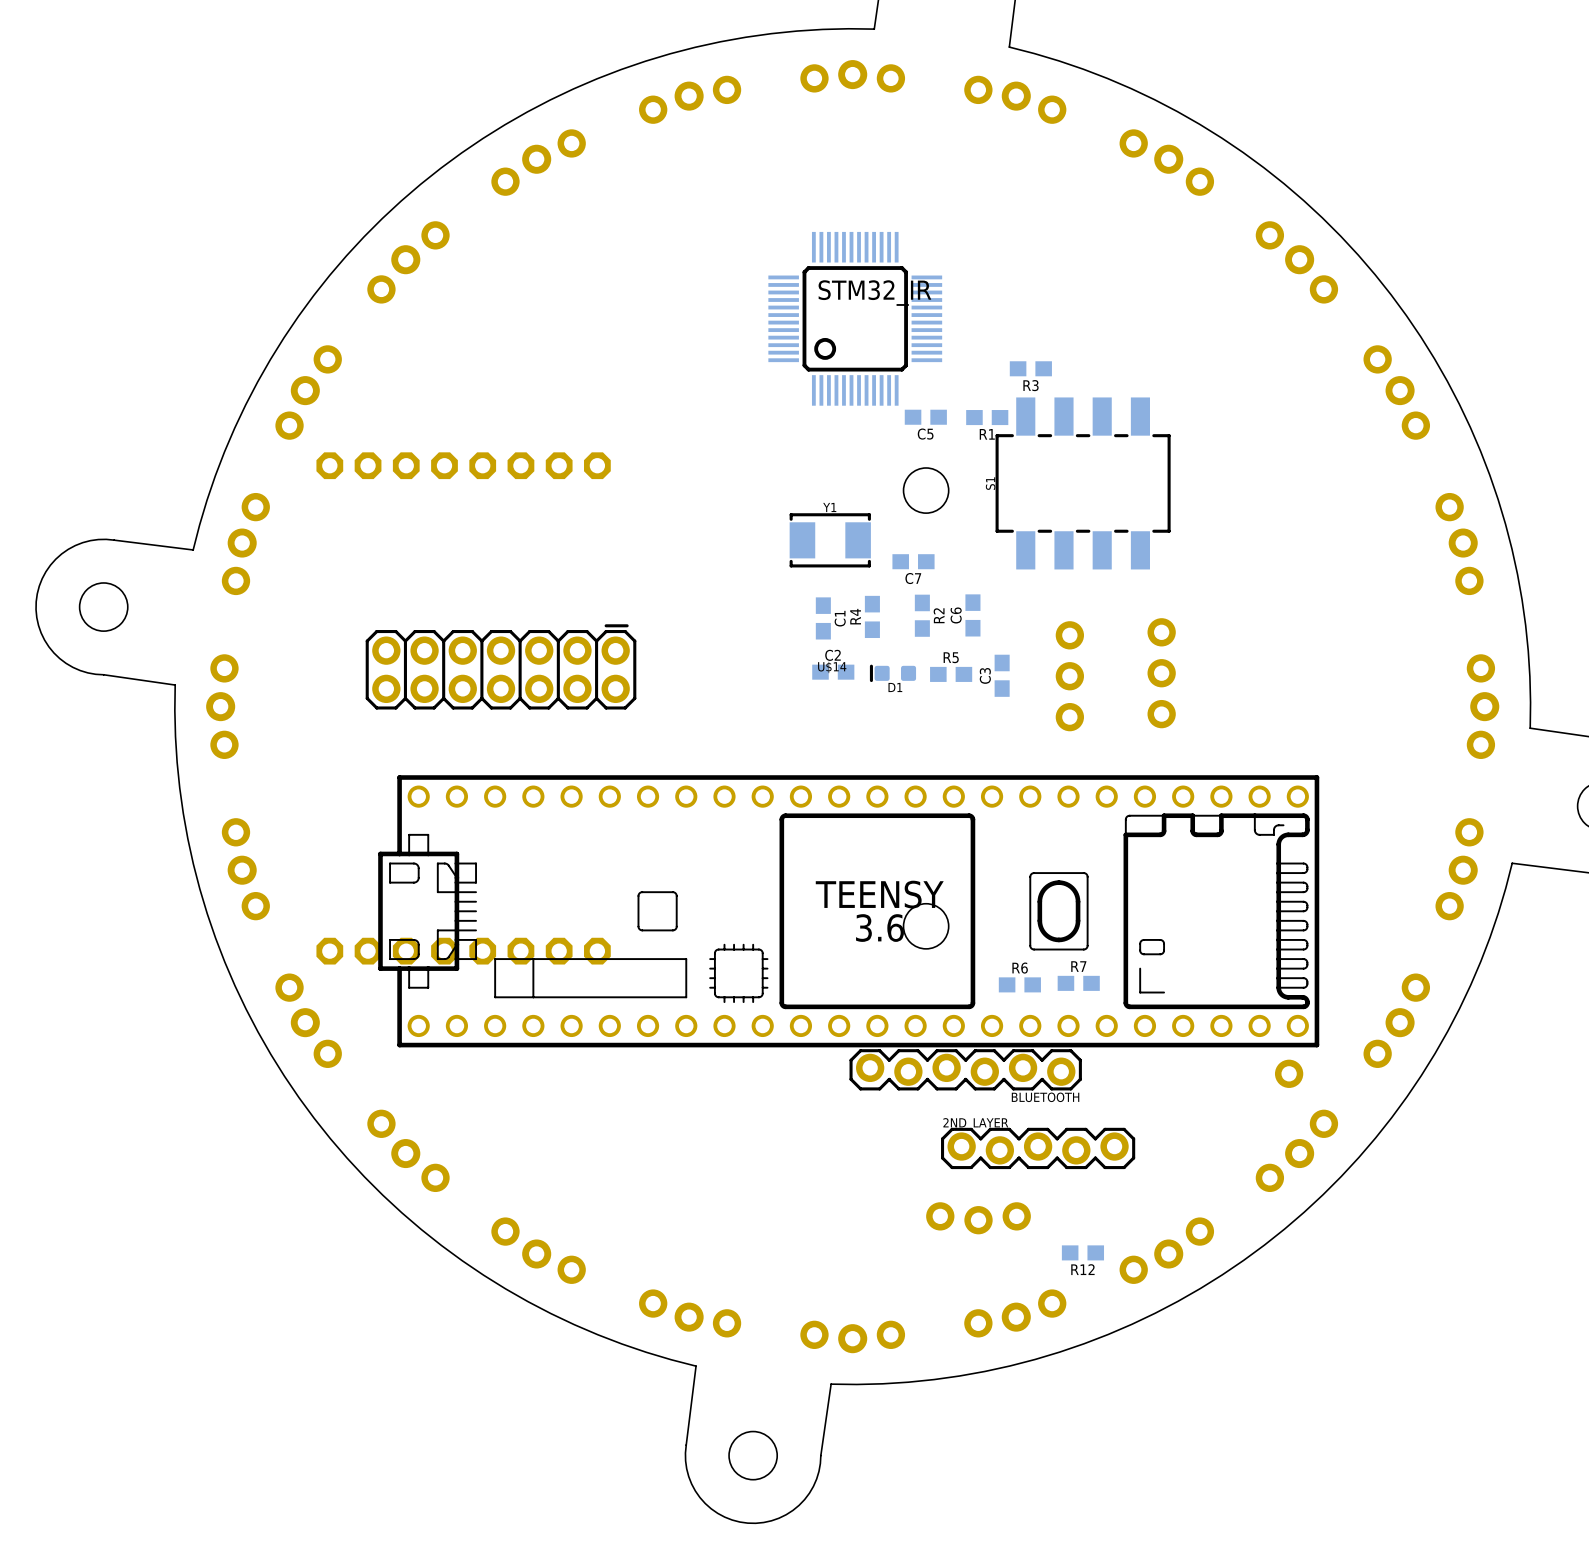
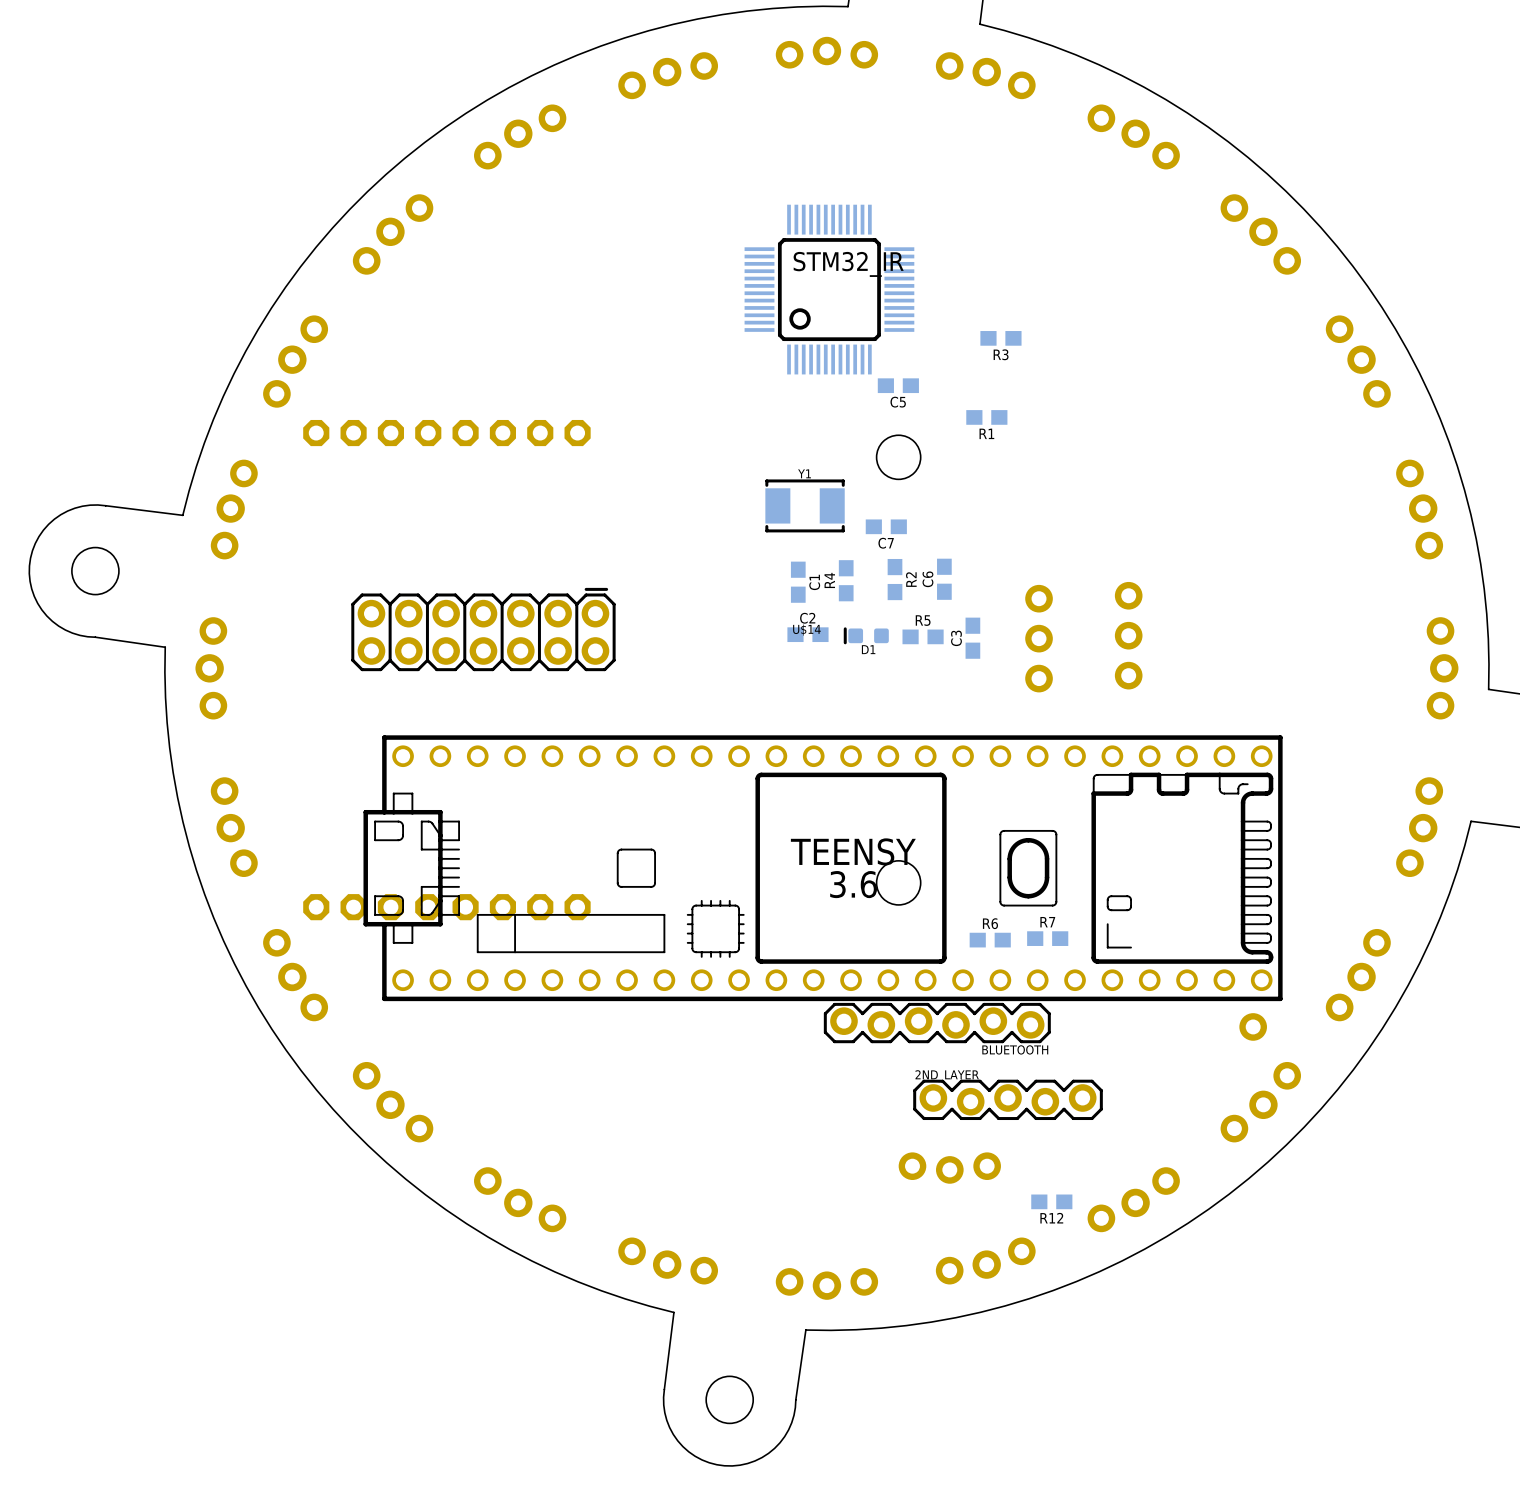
R1 position: (987, 417) -> (986, 417)
S1: (1083, 483) -> none

